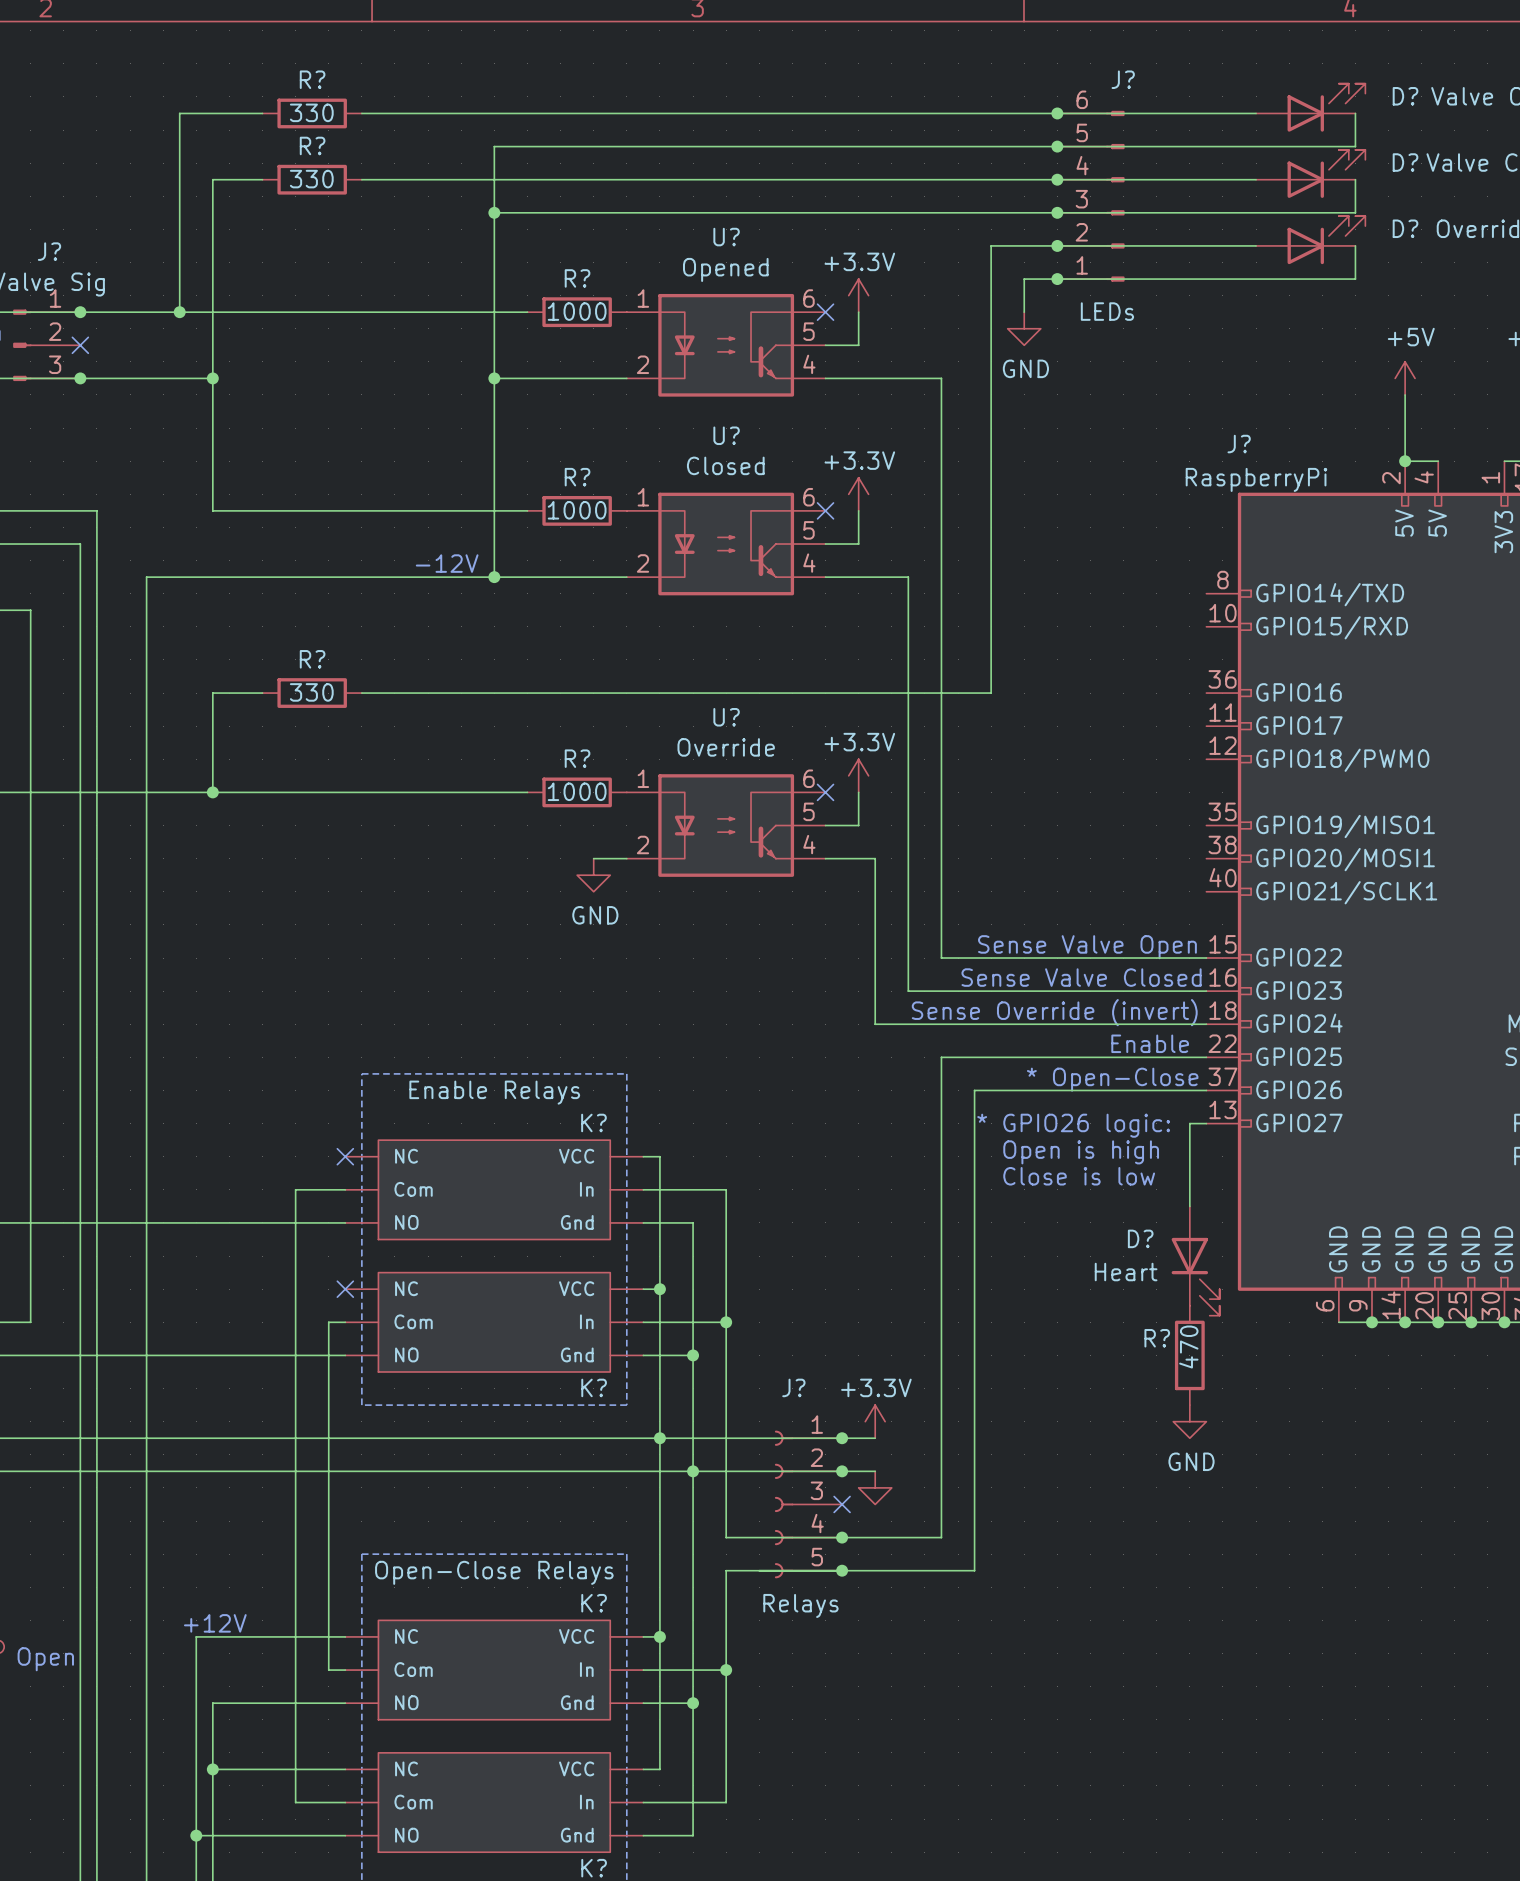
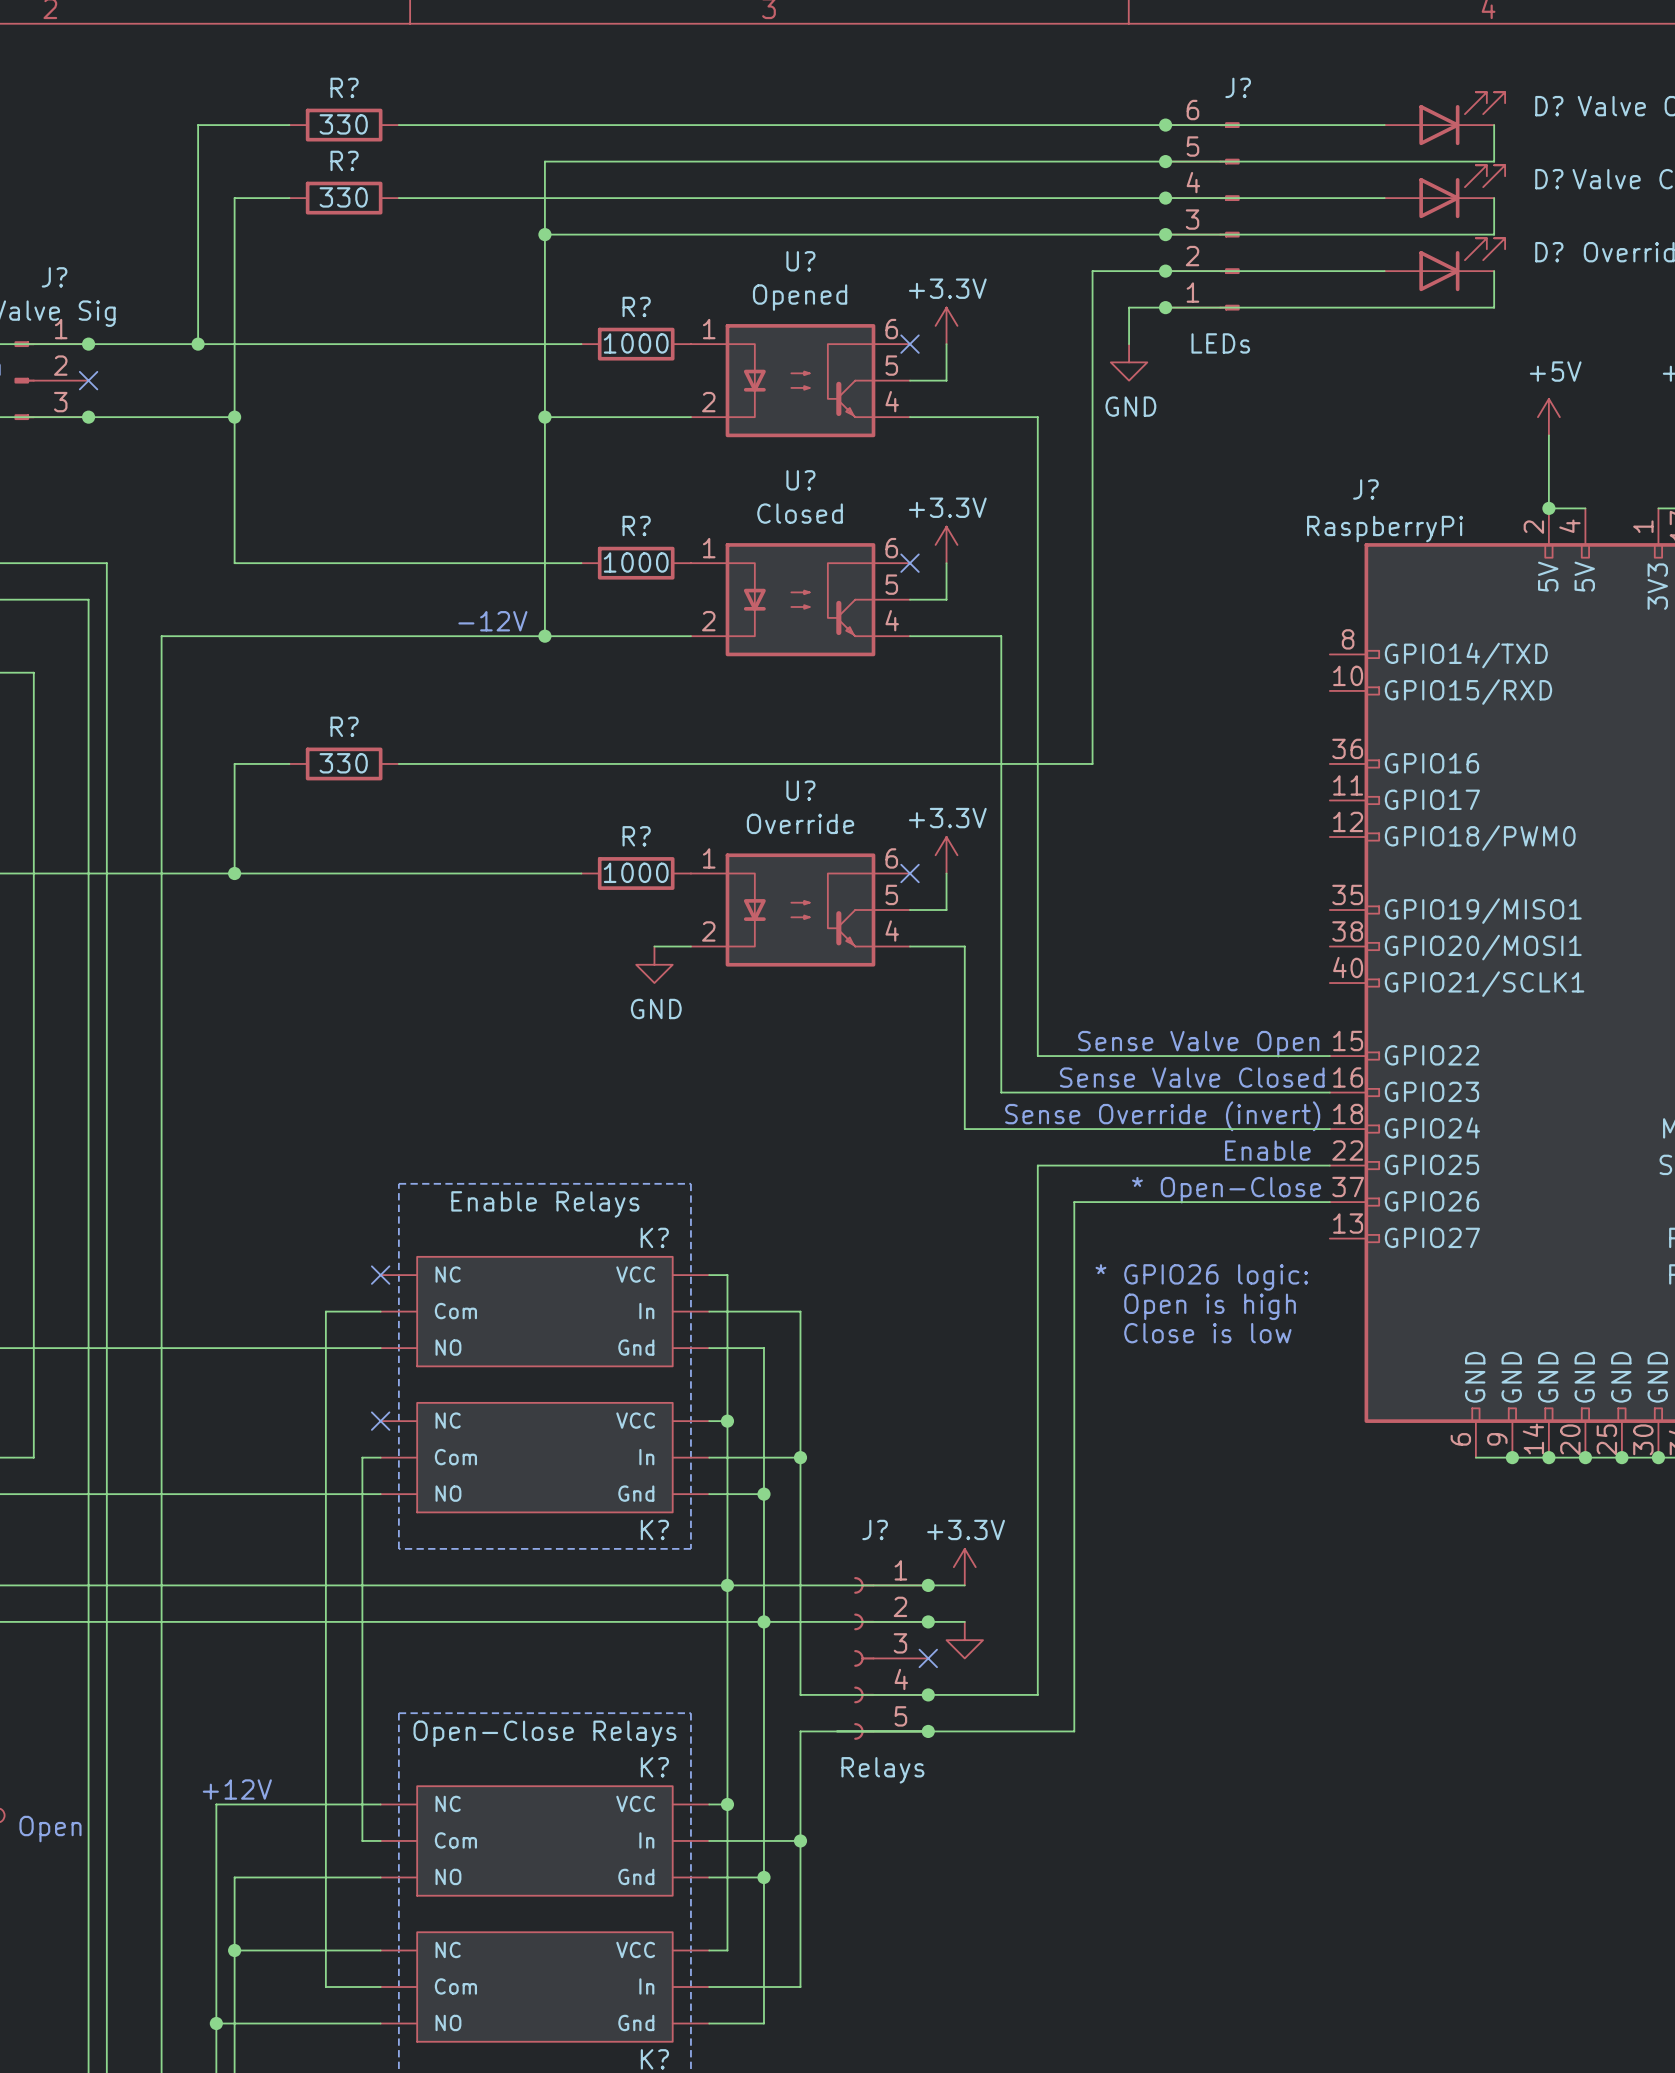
wire: (1206, 1123) (1189, 1123) (1189, 1206) -> none
text position: * GPIO26 logic: (1073, 1125) -> * GPIO26 logic: (1201, 1277)
text position: Open is high (1081, 1152) -> Open is high (1210, 1306)
text position: Close is low (1079, 1176) -> Close is low (1207, 1333)
D?: Heart (1195, 1261) -> none
R?: 470 (1189, 1355) -> none
power symbol: GND (1189, 1421) -> none

